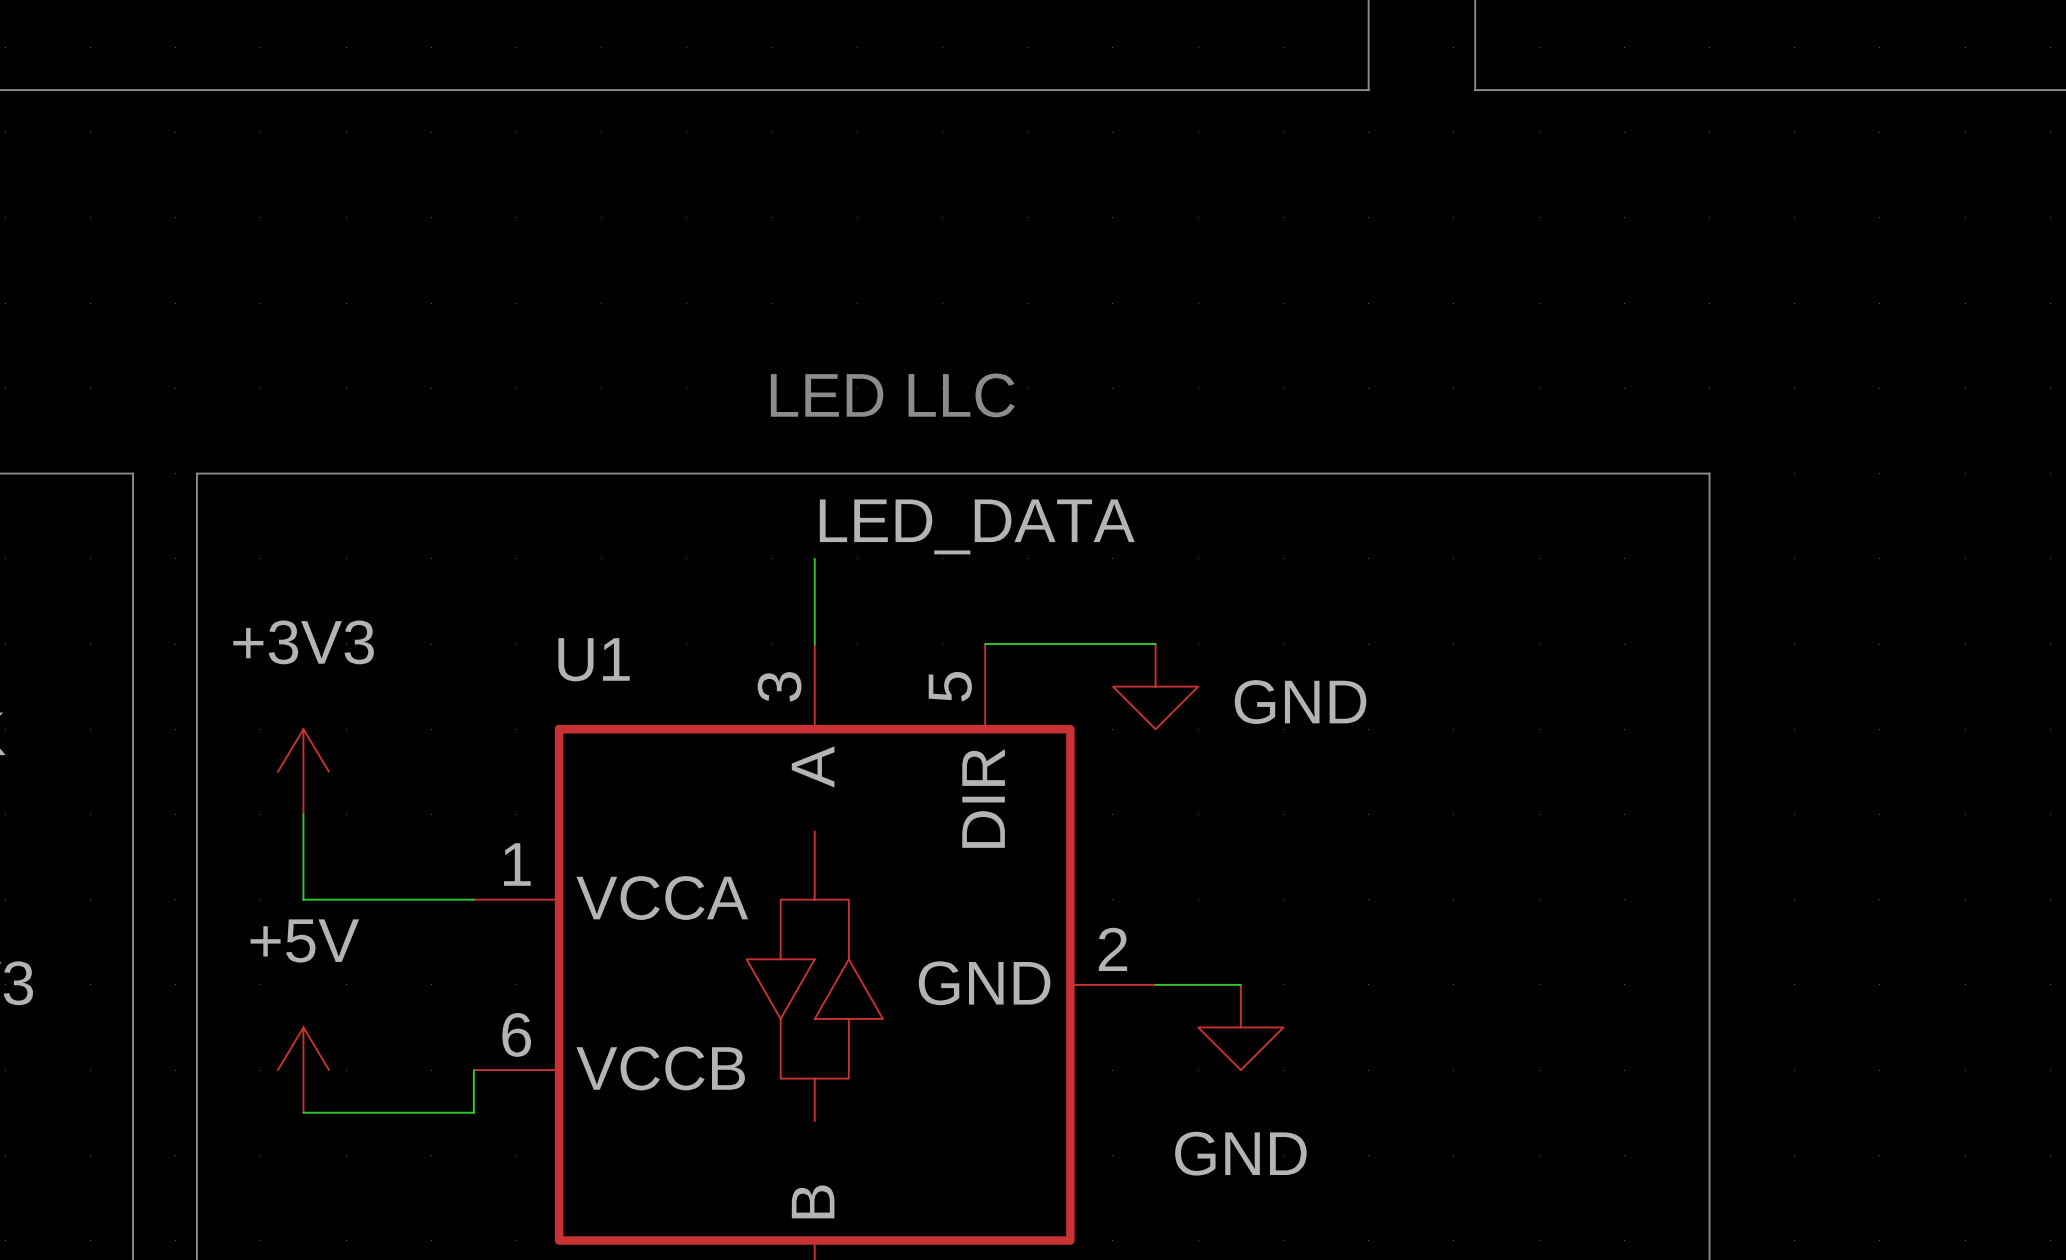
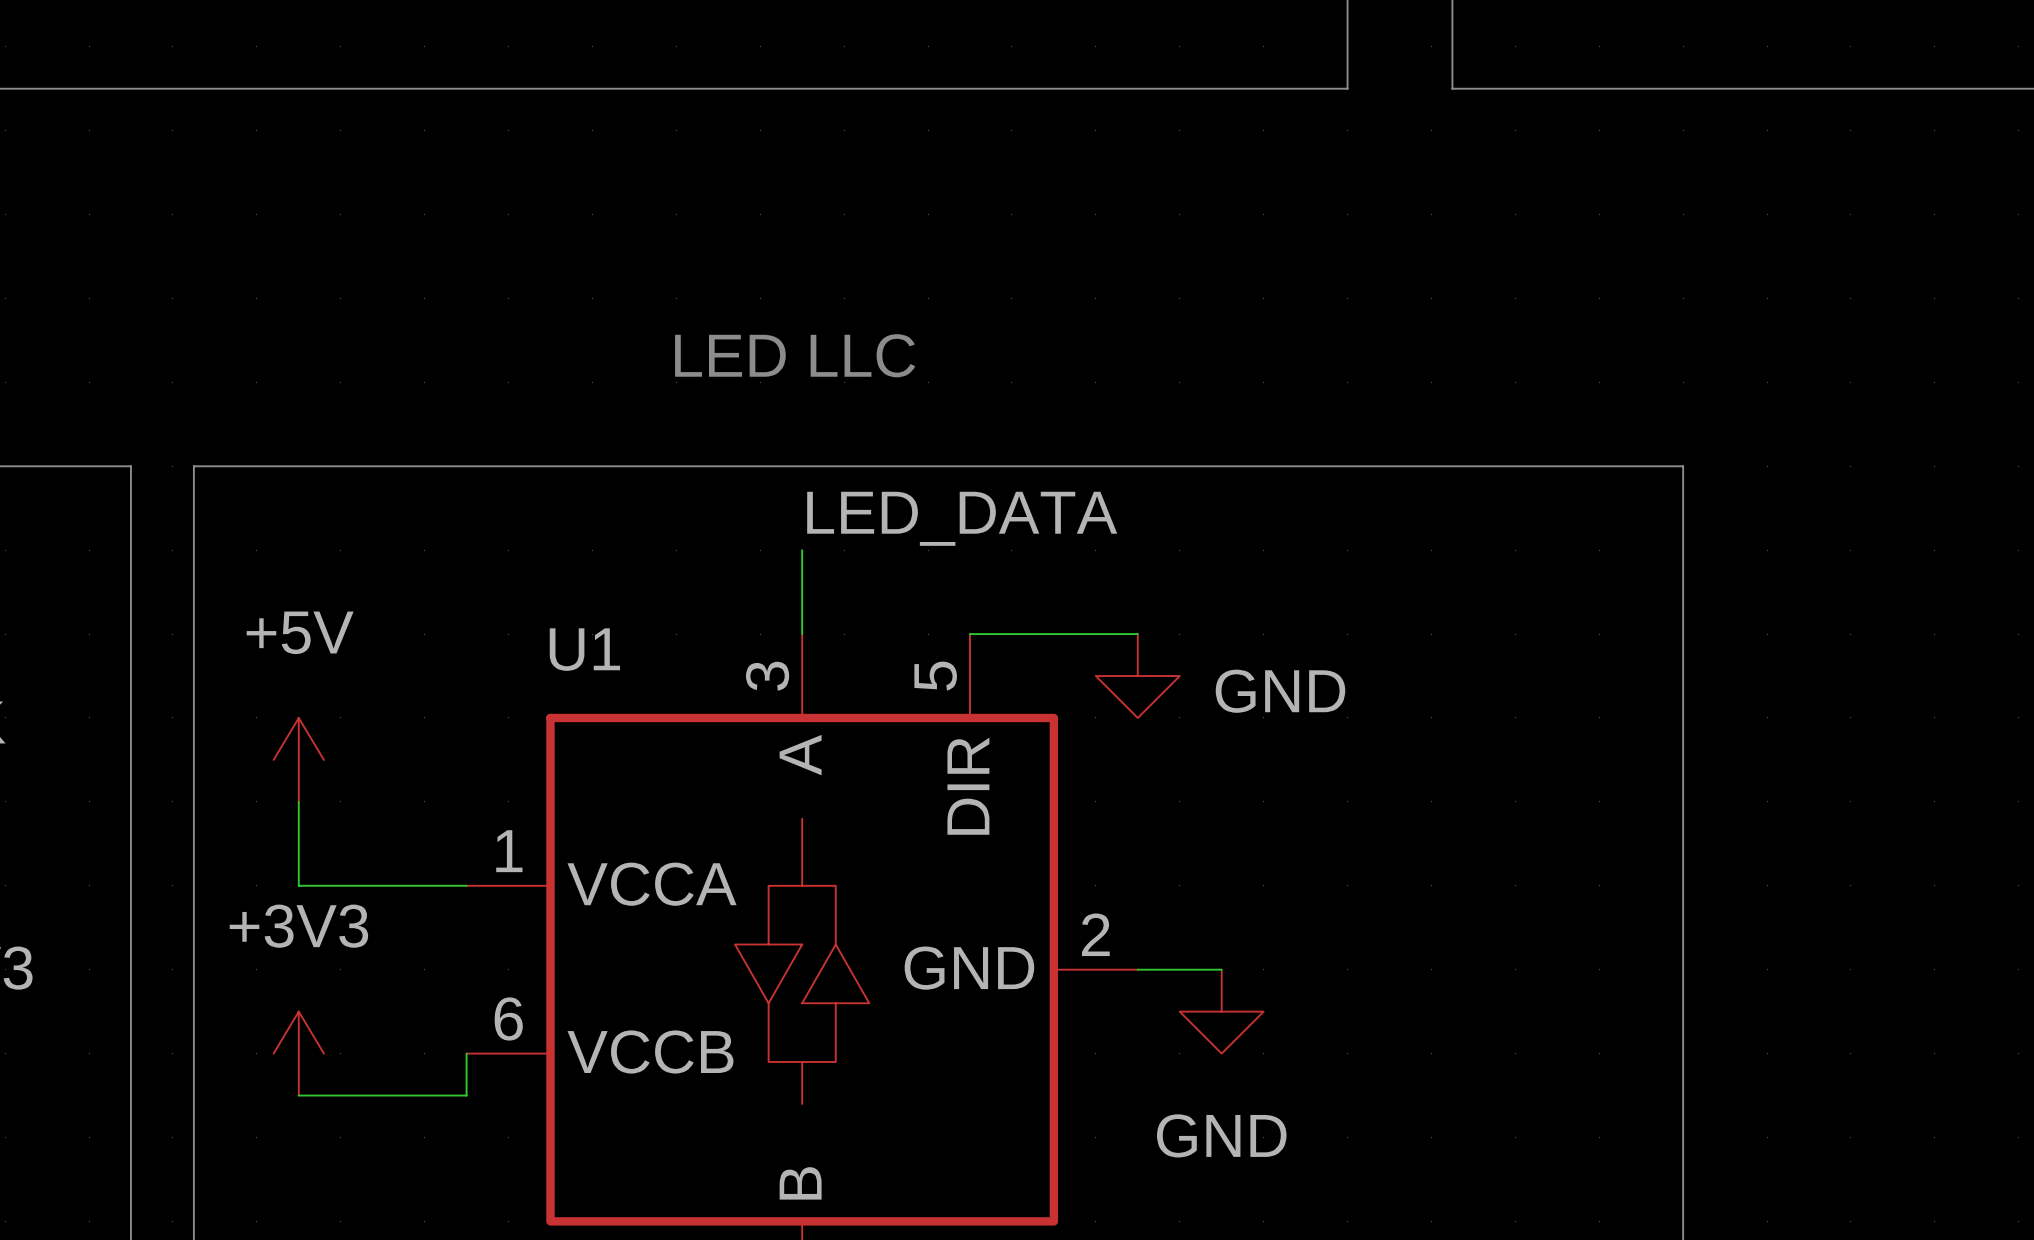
text position: LED LLC (892, 395) -> LED LLC (795, 355)
power symbol: +3V3 (303, 771) -> +5V (298, 759)
power symbol: +5V (303, 1070) -> +3V3 (298, 1053)

